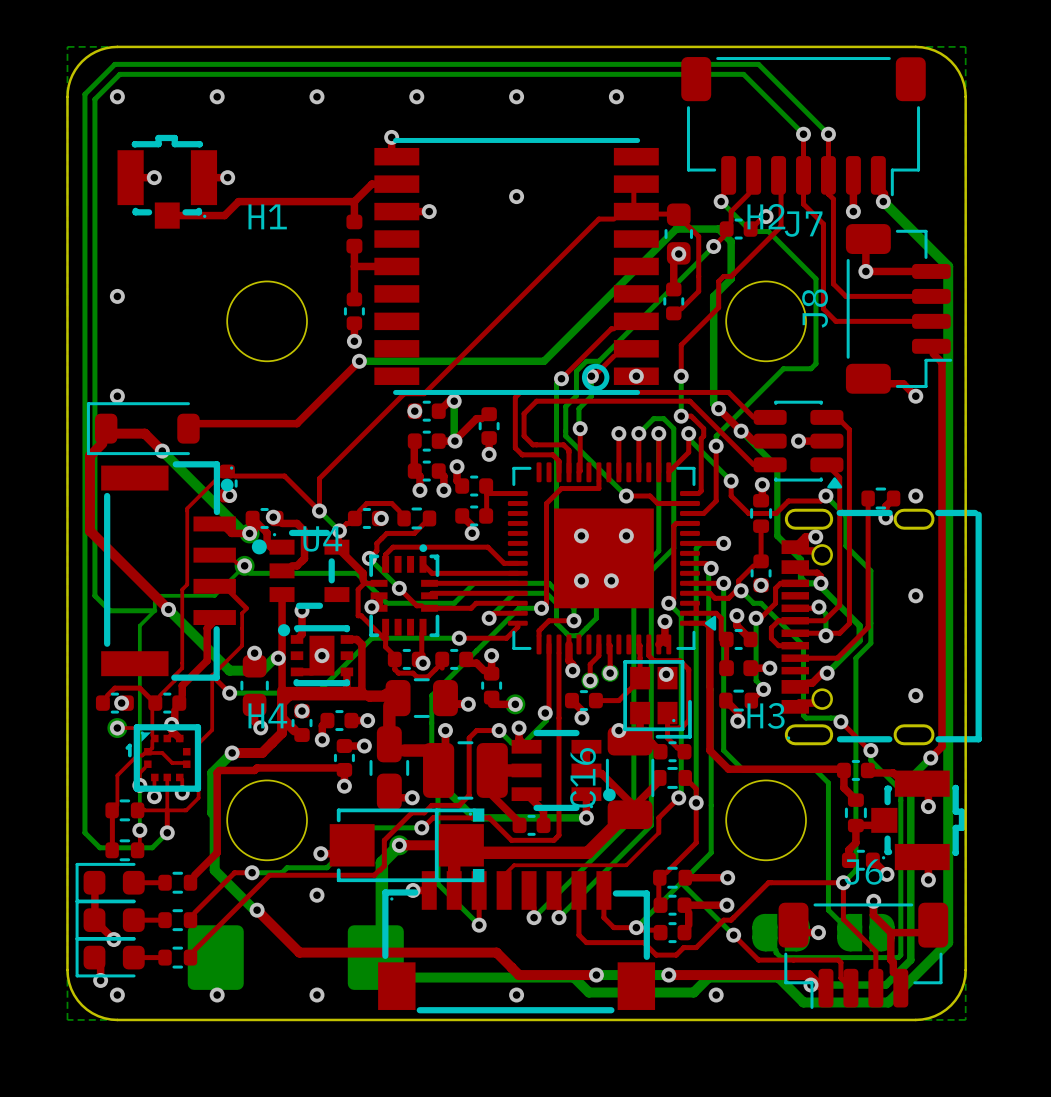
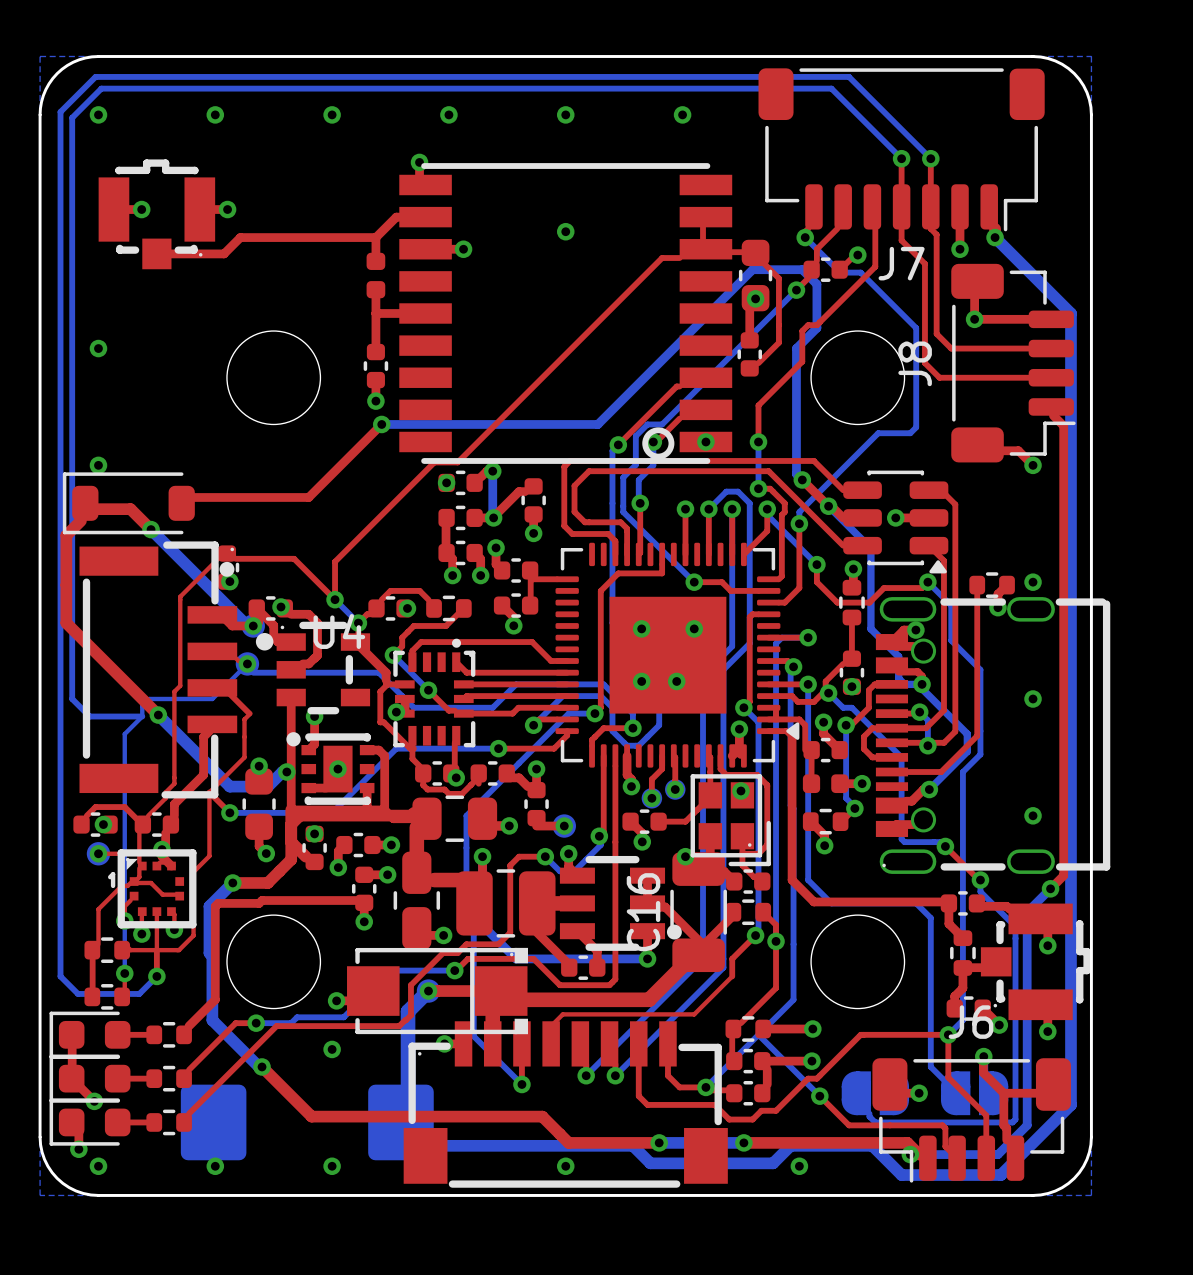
H1 name: H1 (267, 216) -> none
H2 name: H2 (766, 216) -> none
H4 name: H4 (267, 715) -> none
H3 name: H3 (766, 715) -> none

